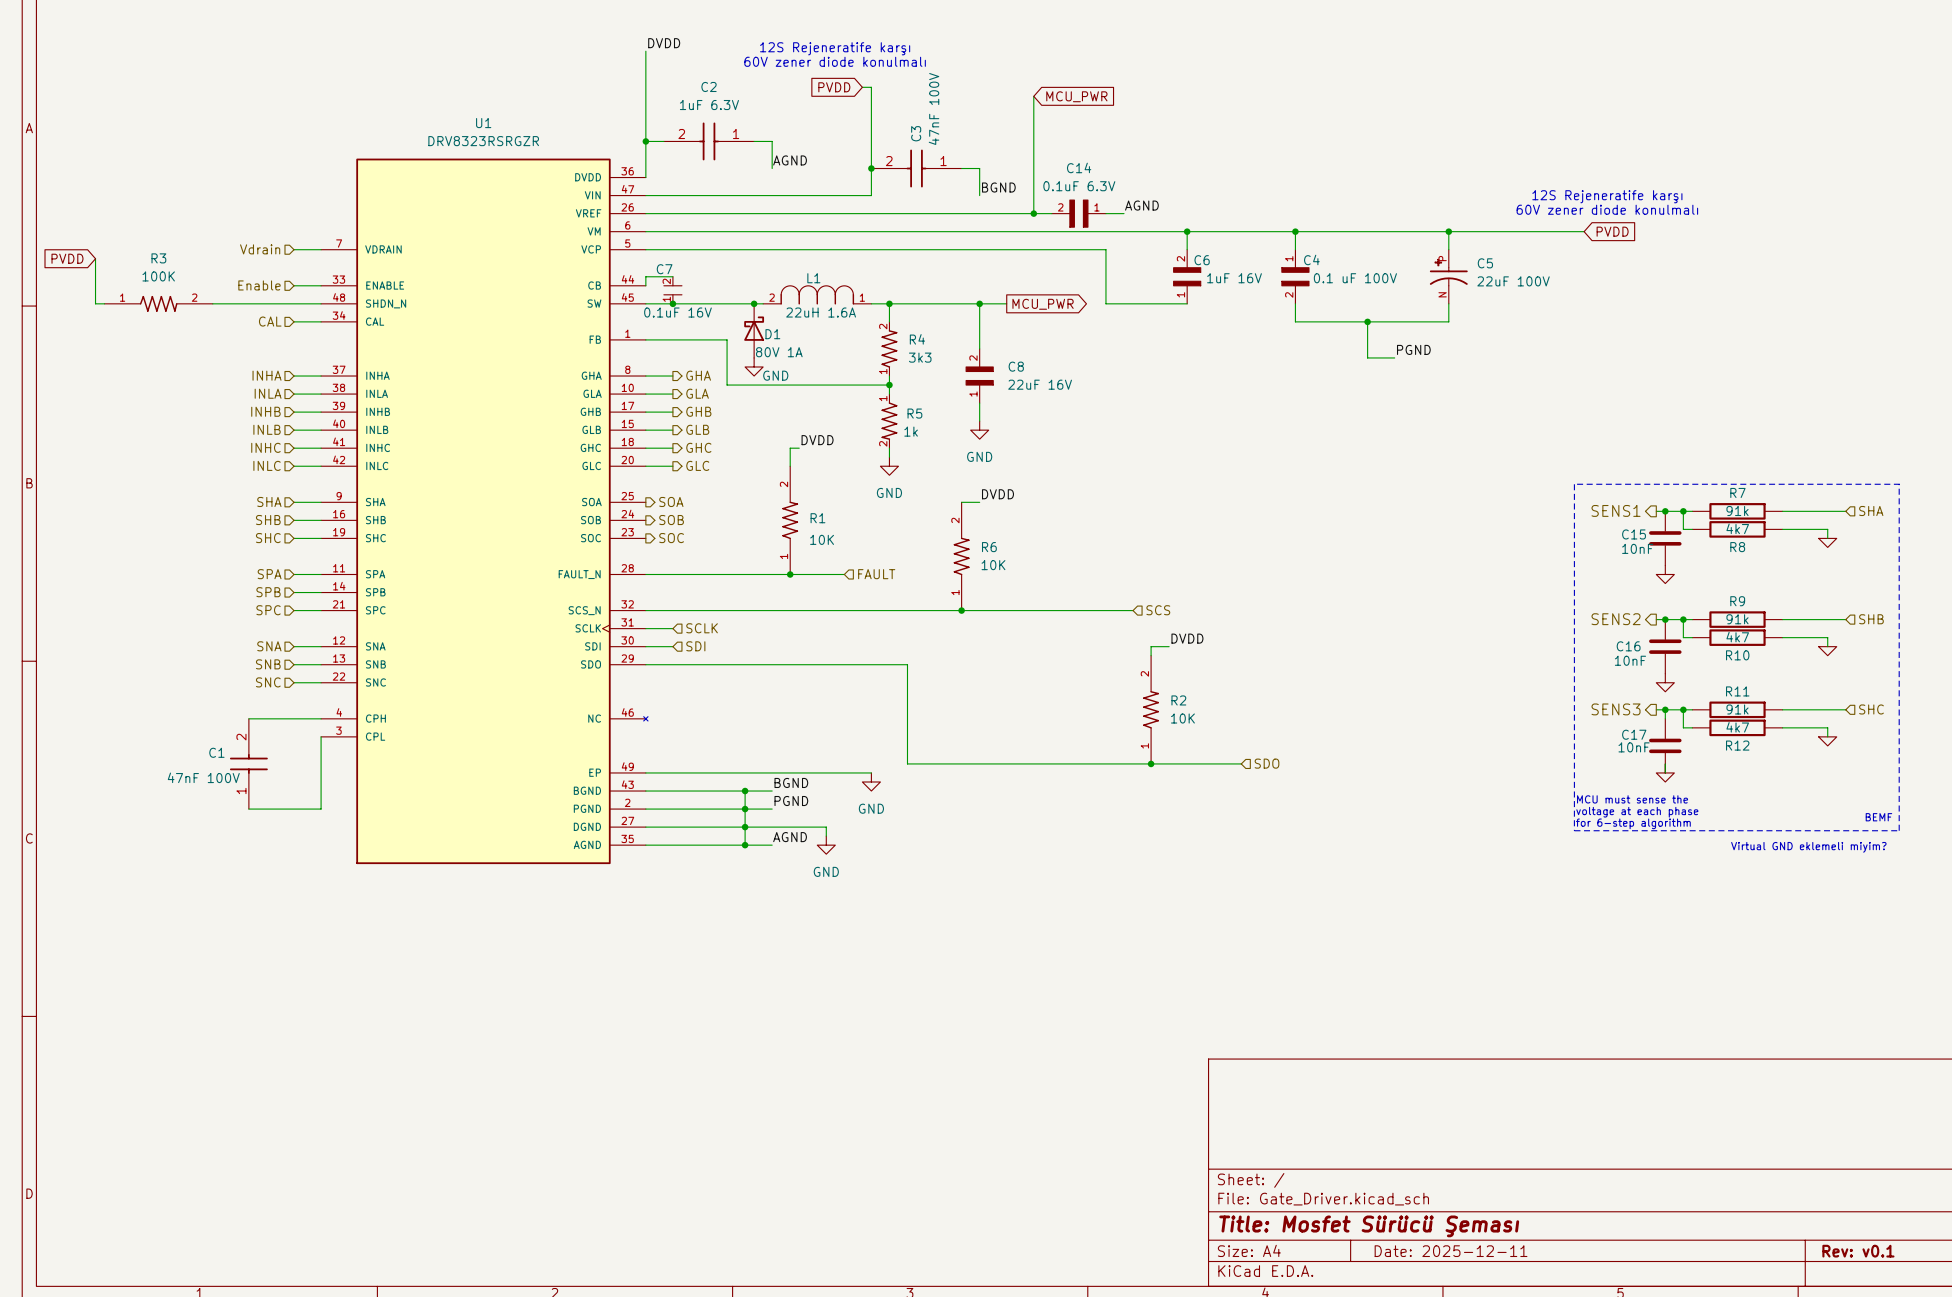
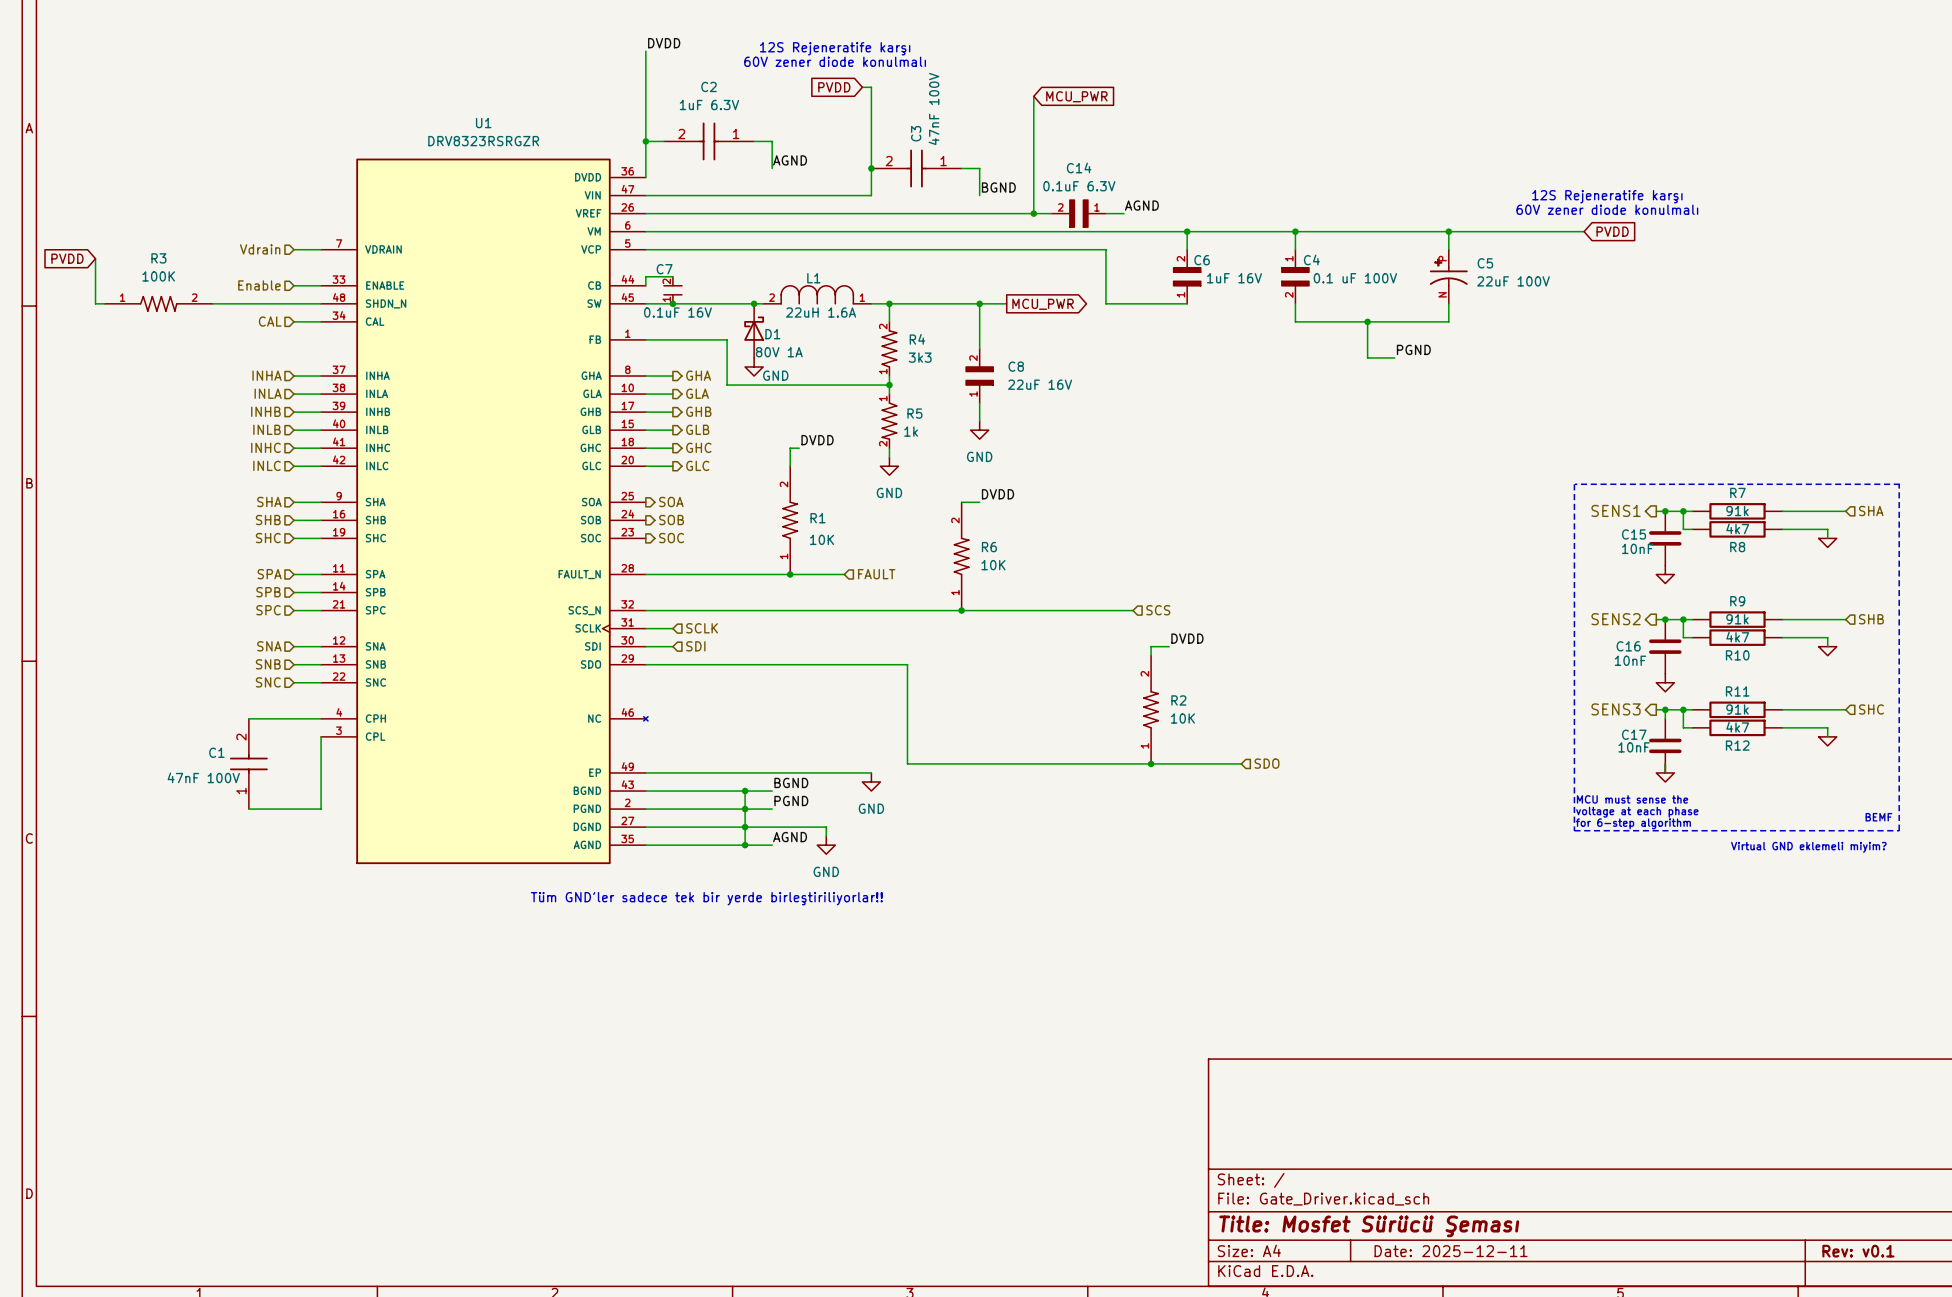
text: none -> Tüm GND'ler sadece tek bir yerde birleştiriliyorlar!! (706, 898)

